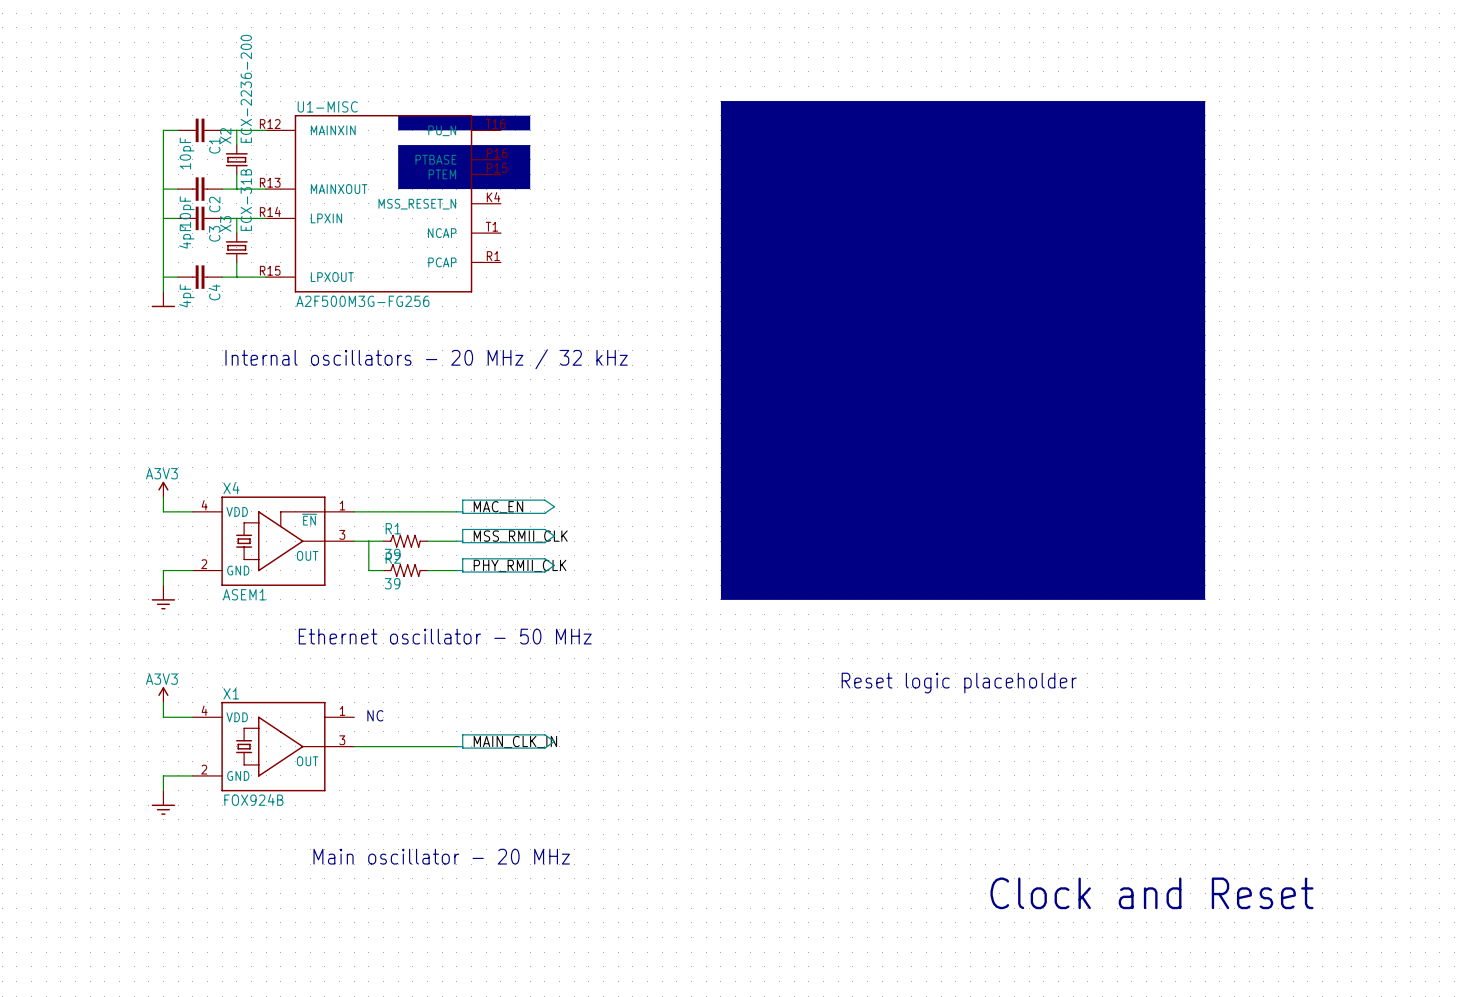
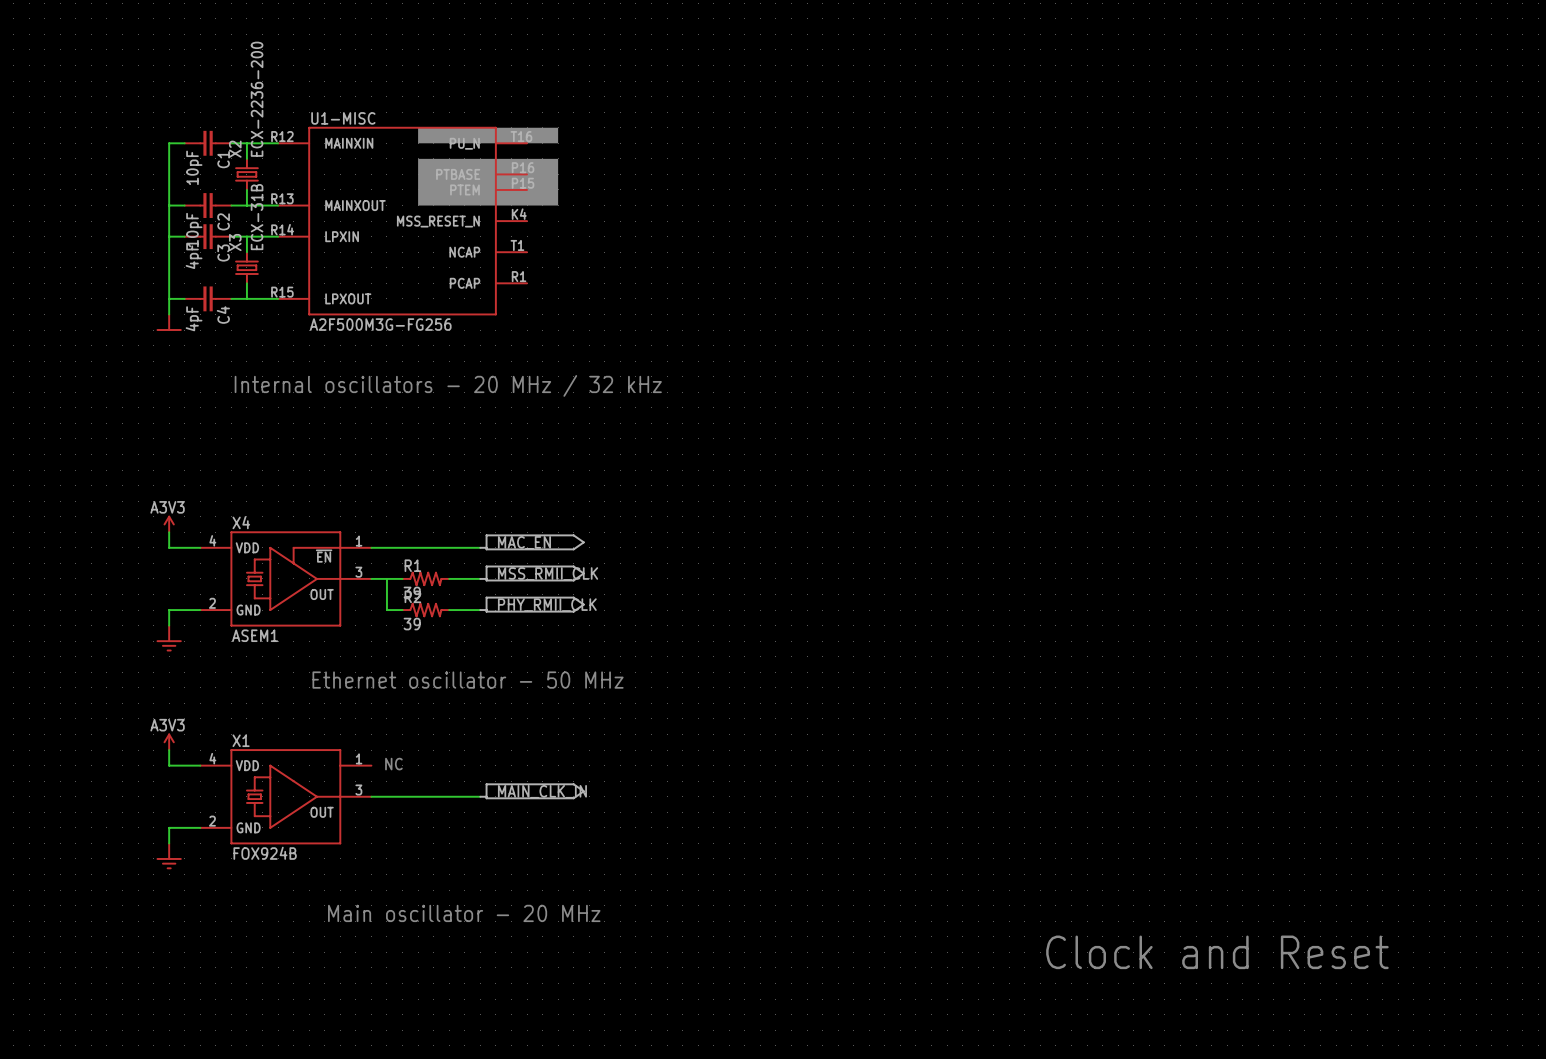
drawing: [720, 101, 1206, 600] -> none
text: Reset logic placeholder (959, 683) -> none

